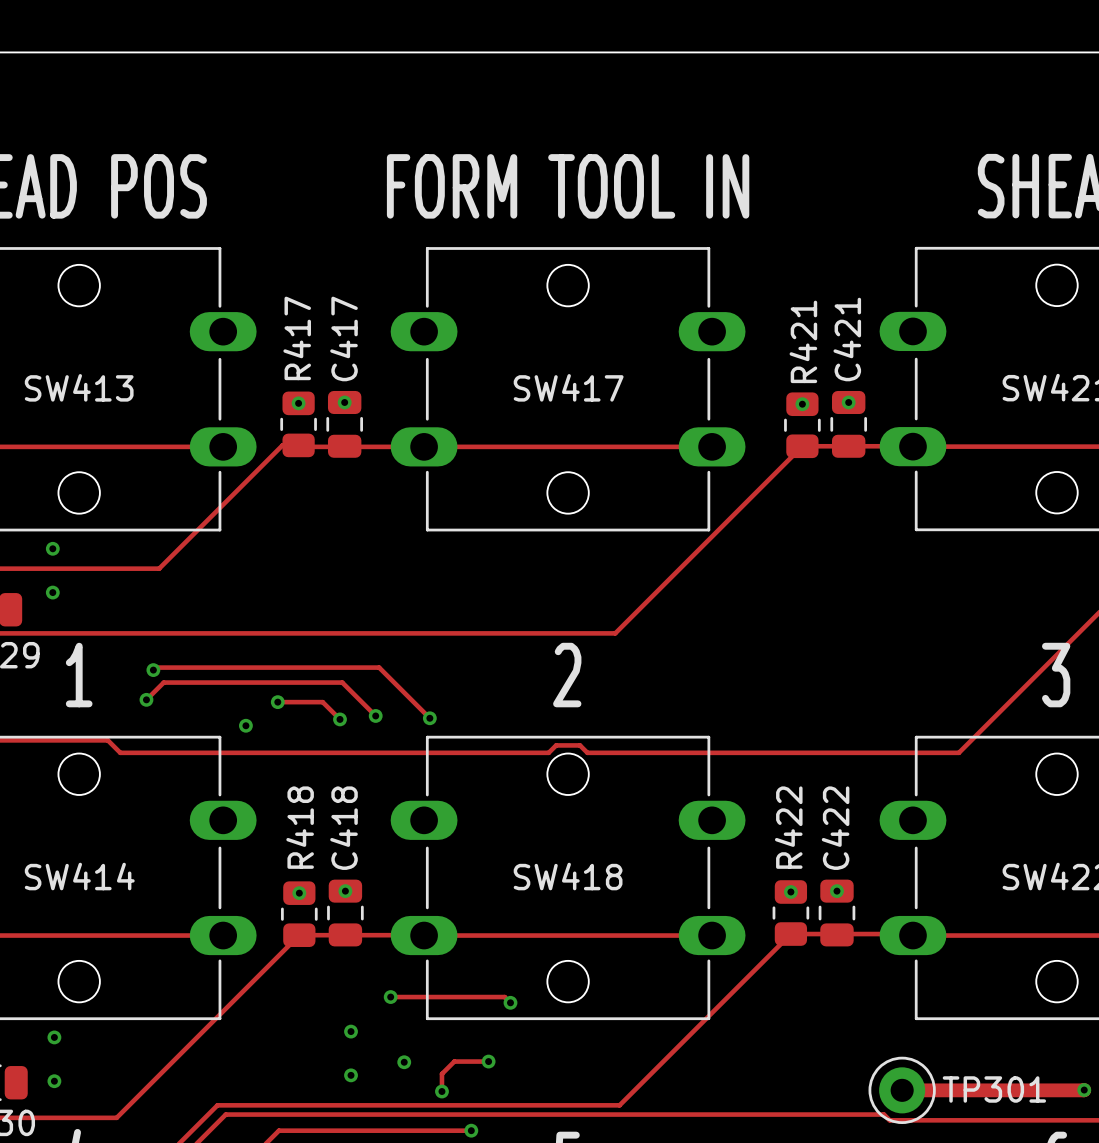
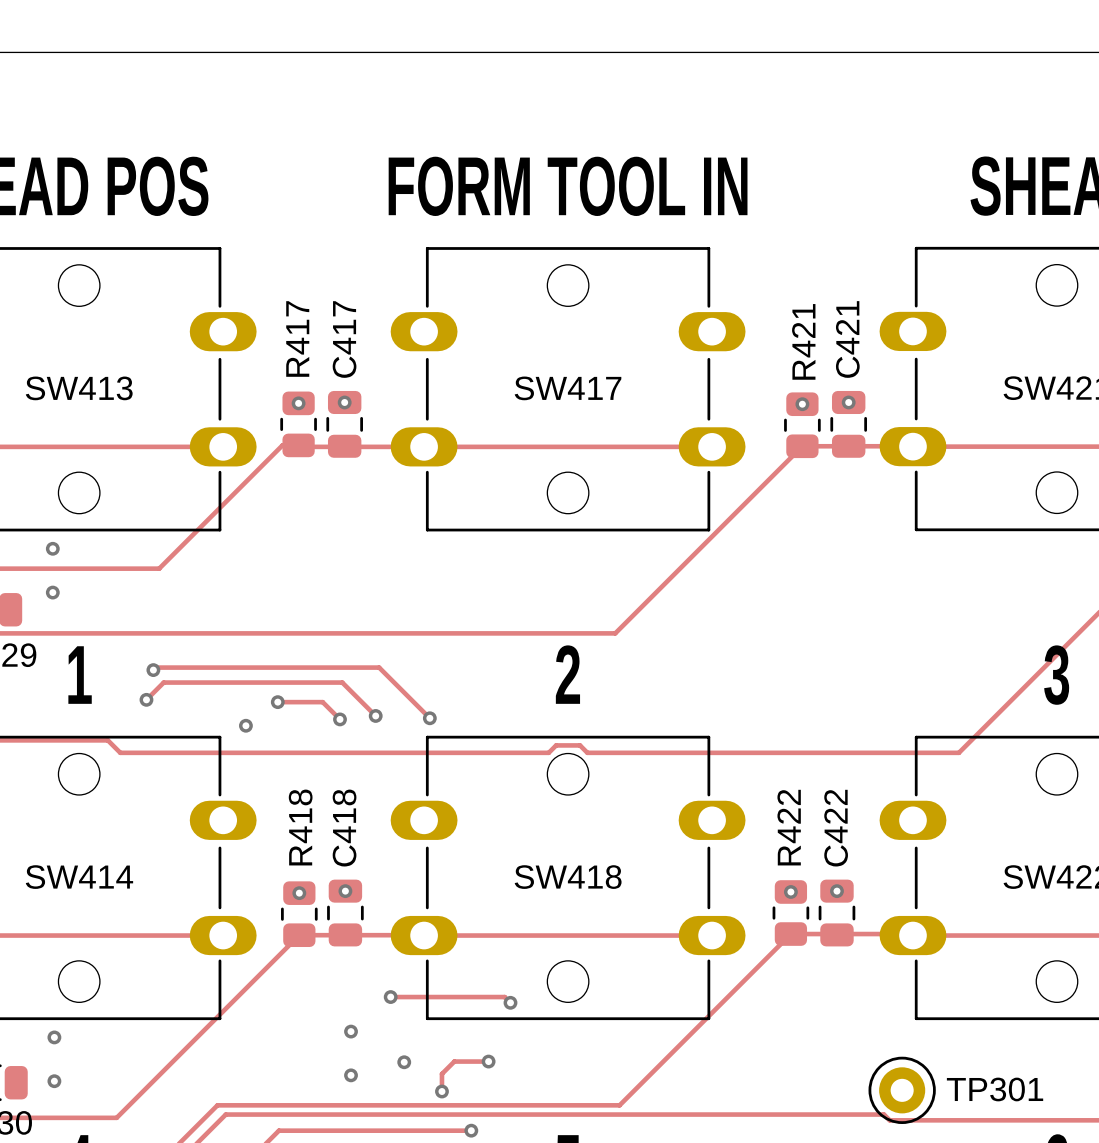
track: (902, 1090) (1083, 1090) -> none
via: (1084, 1090) -> none

